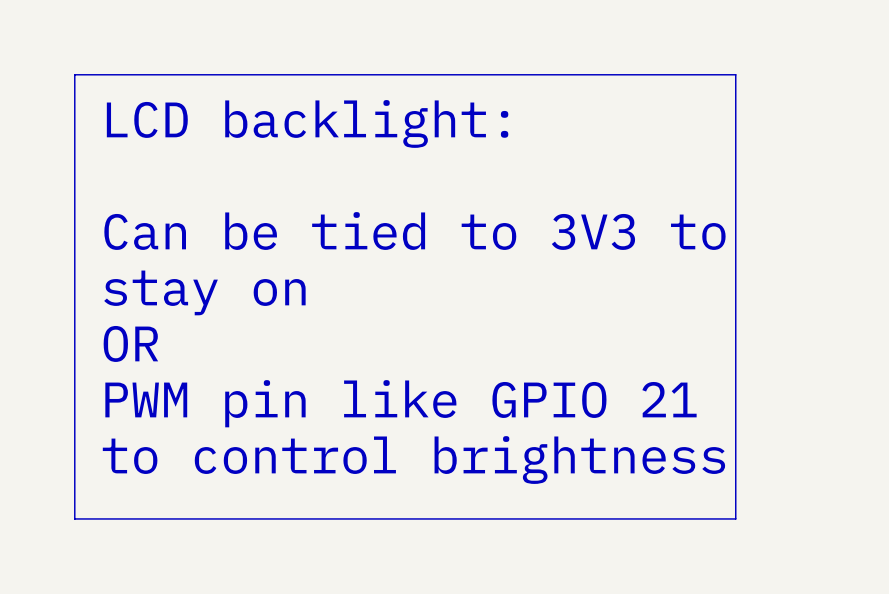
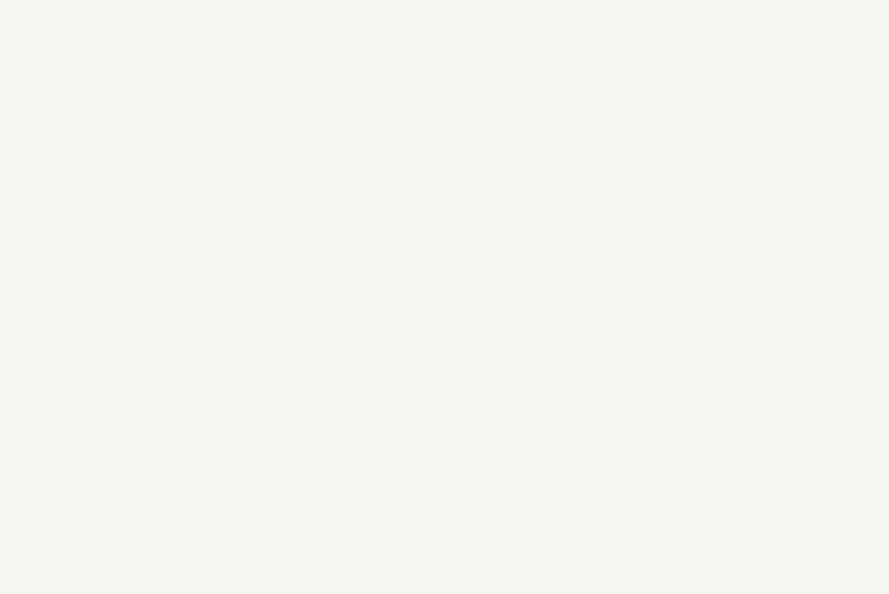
line: (74, 74) (735, 74) (735, 518) (74, 518) (74, 74) -> none
text: LCD backlight: (307, 123) -> none
text: Can be tied to 3V3 to (414, 230) -> none
text: stay on (204, 292) -> none
text: OR (130, 343) -> none
text: PWM pin like GPIO 21 (400, 403) -> none
text: to control brightness (413, 460) -> none

